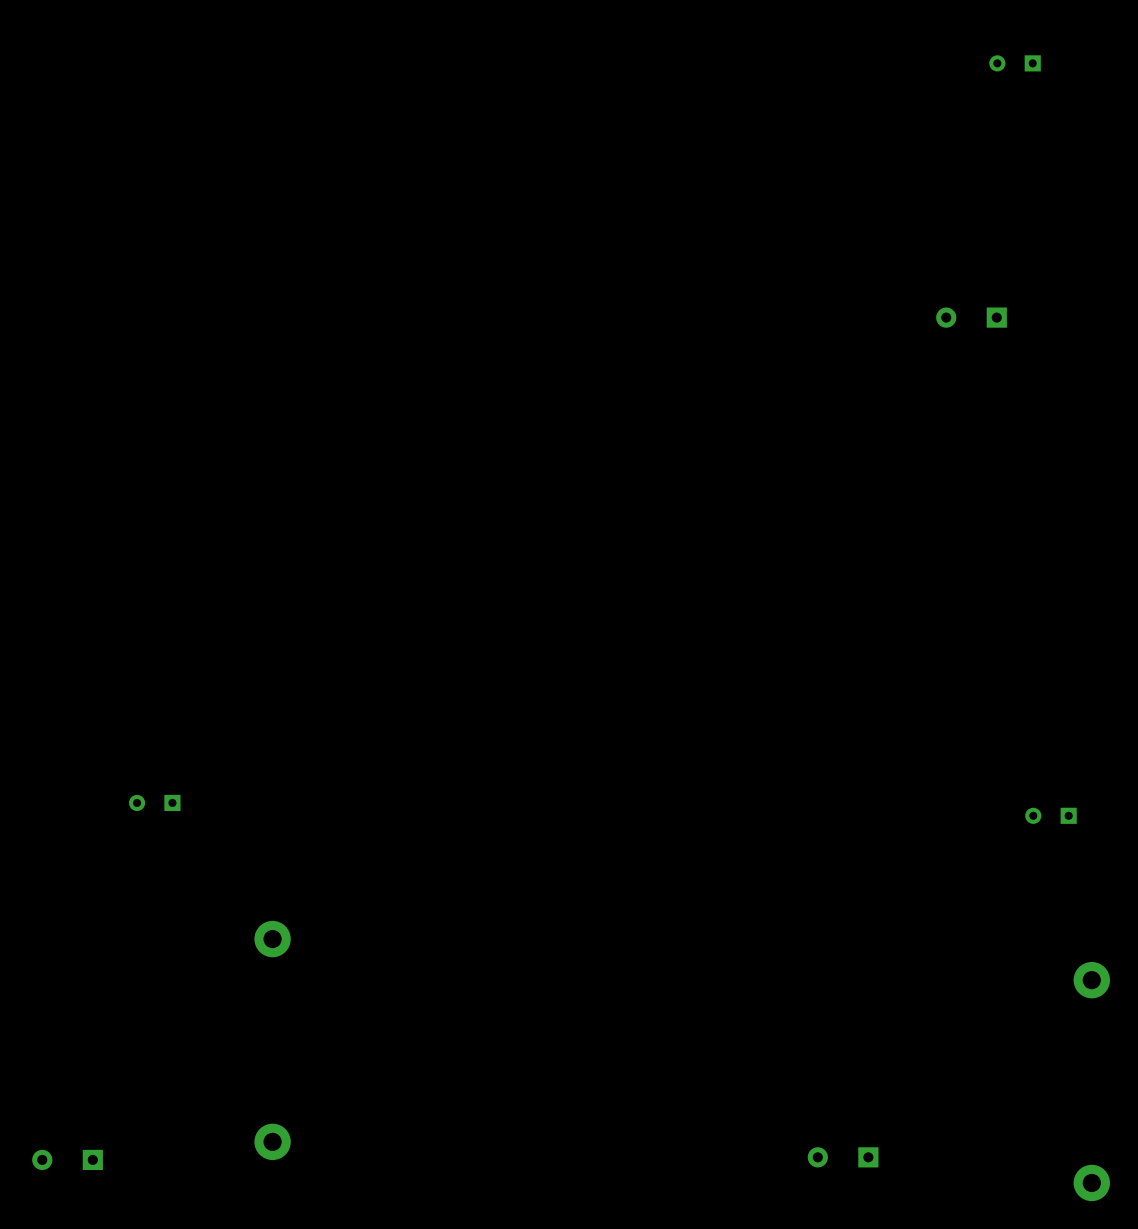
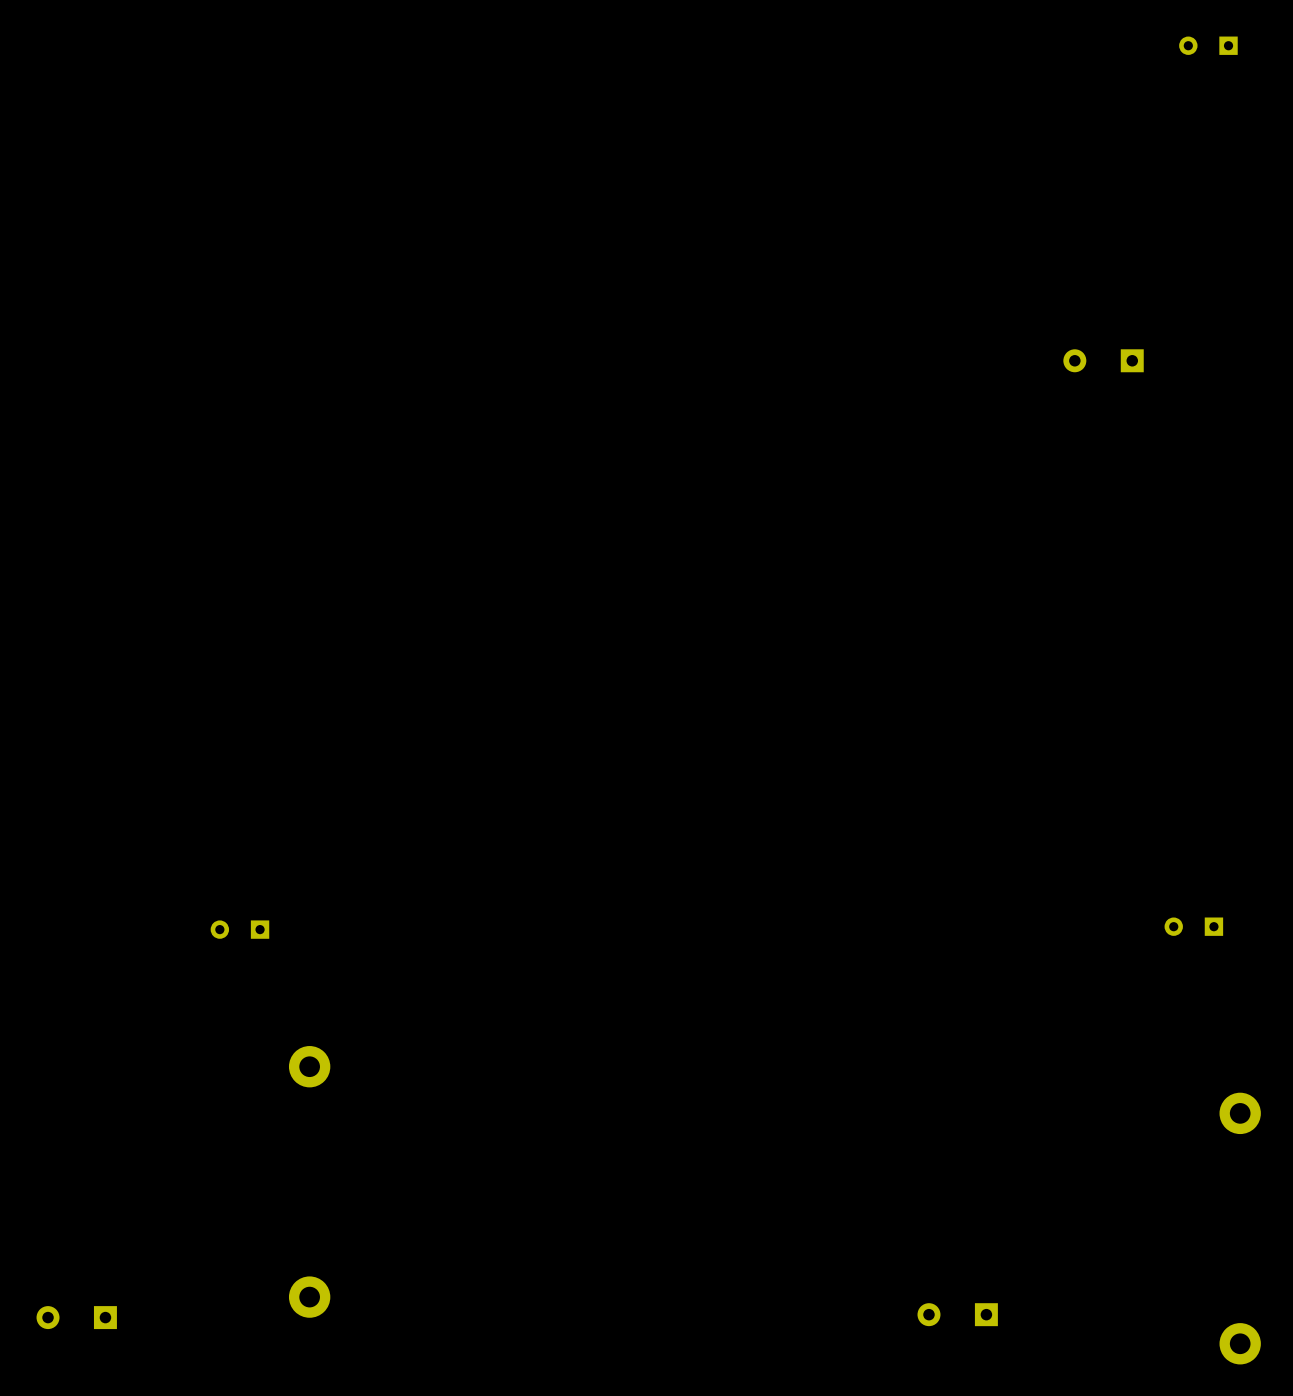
part position: (1015, 63) -> (1208, 45)
part position: (154, 802) -> (239, 929)

